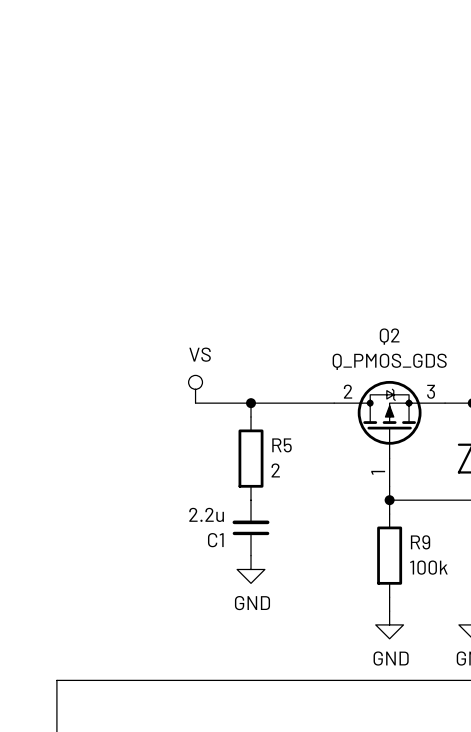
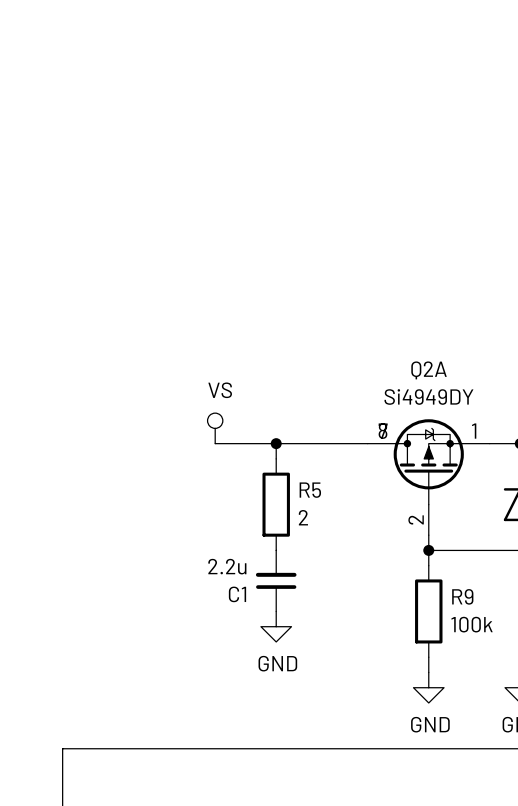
Q2 name: Q2 (389, 336) -> Q2A (429, 370)
Q2 value: Q_PMOS_GDS (389, 361) -> Si4949DY (428, 396)
Q2 symbol: [334, 380, 446, 487] -> [367, 419, 490, 536]

